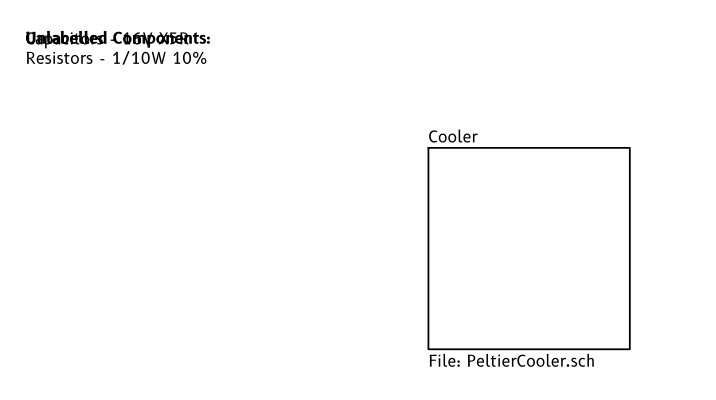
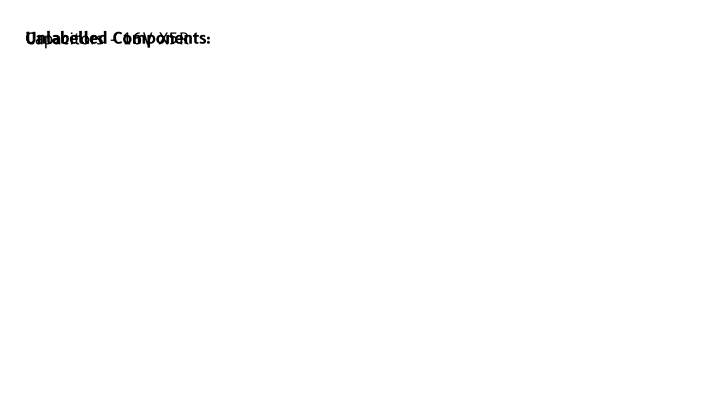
text: Resistors - 1/10W 10% (116, 57) -> none
sheet Cooler: File: PeltierCooler.sch (529, 248) -> none

